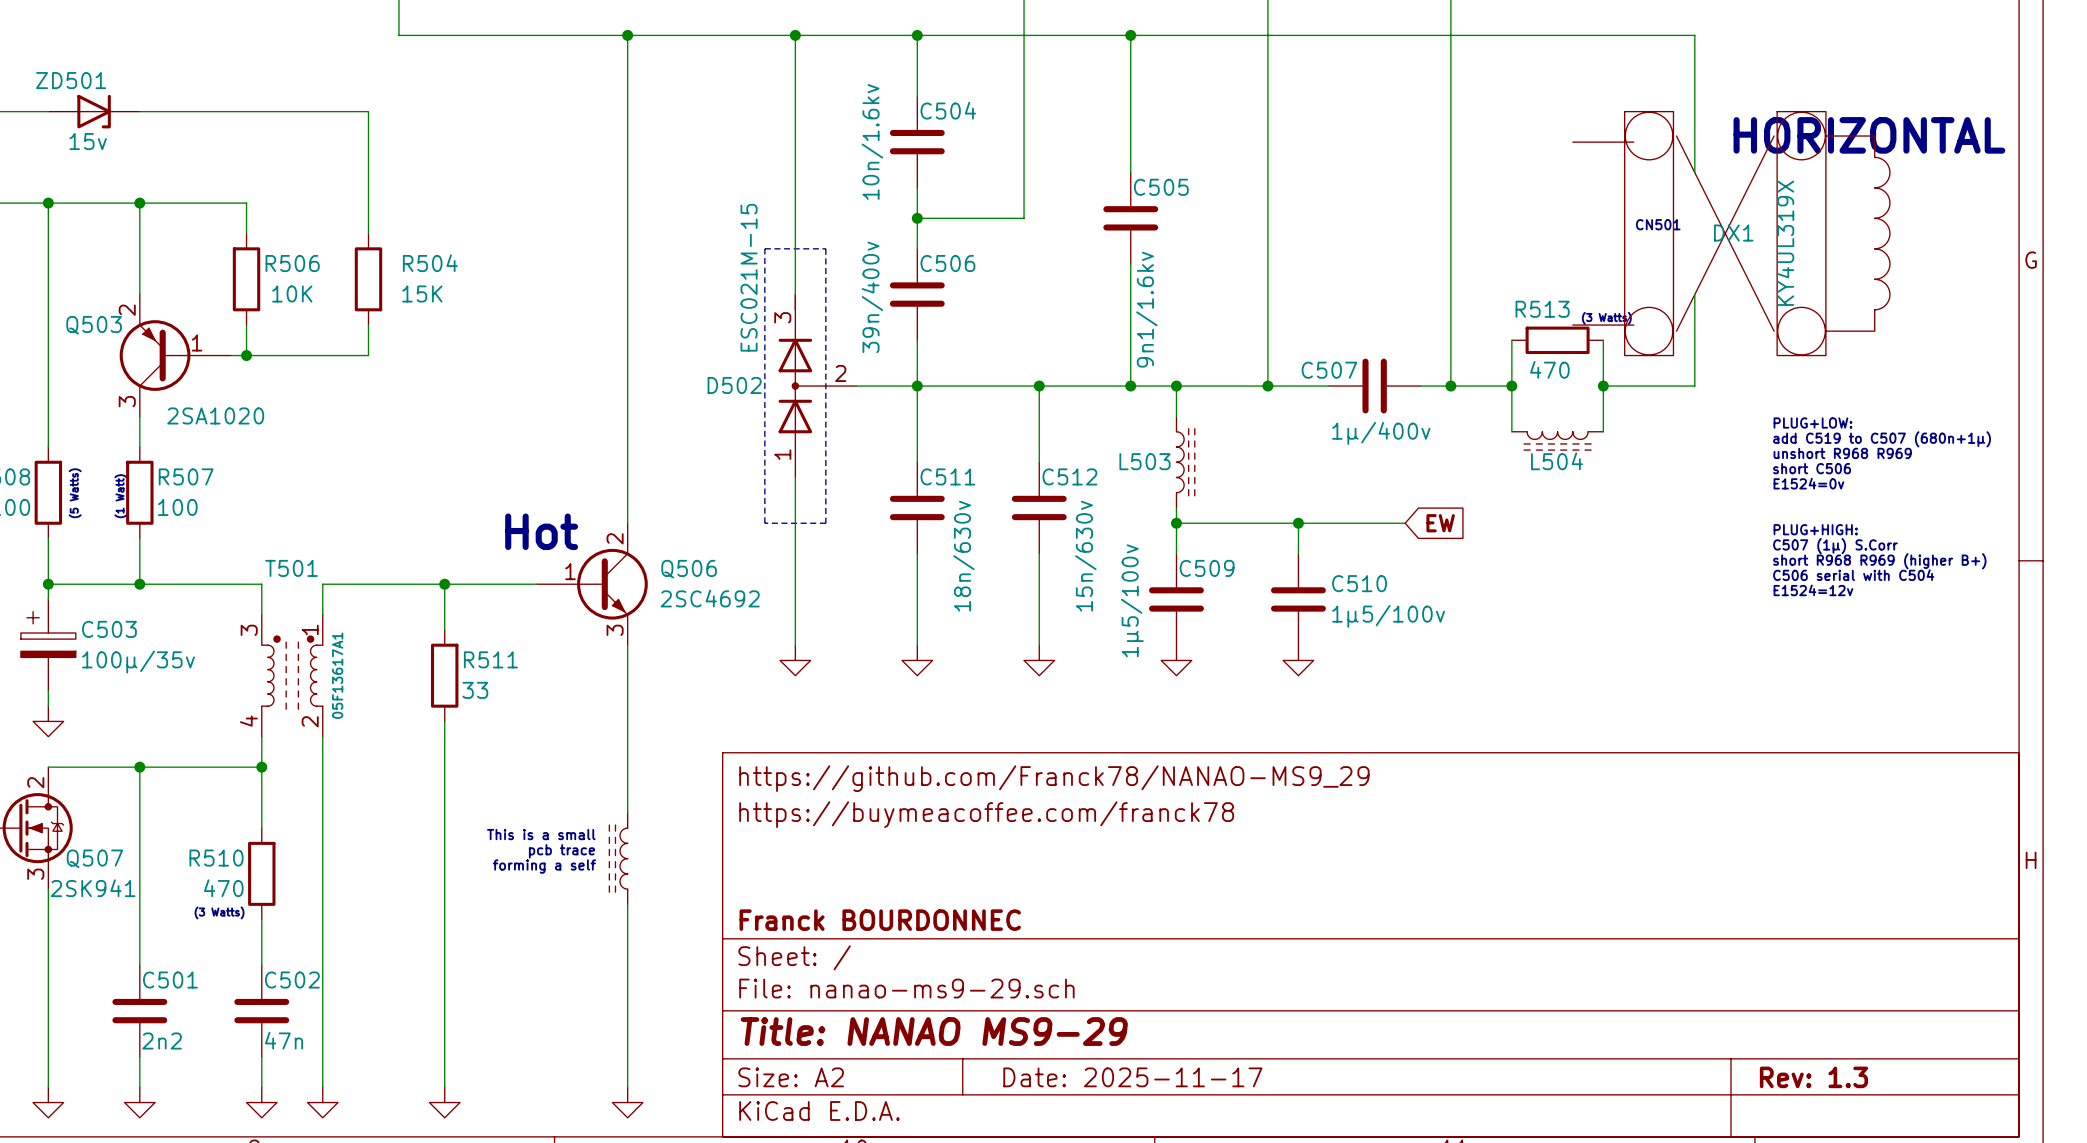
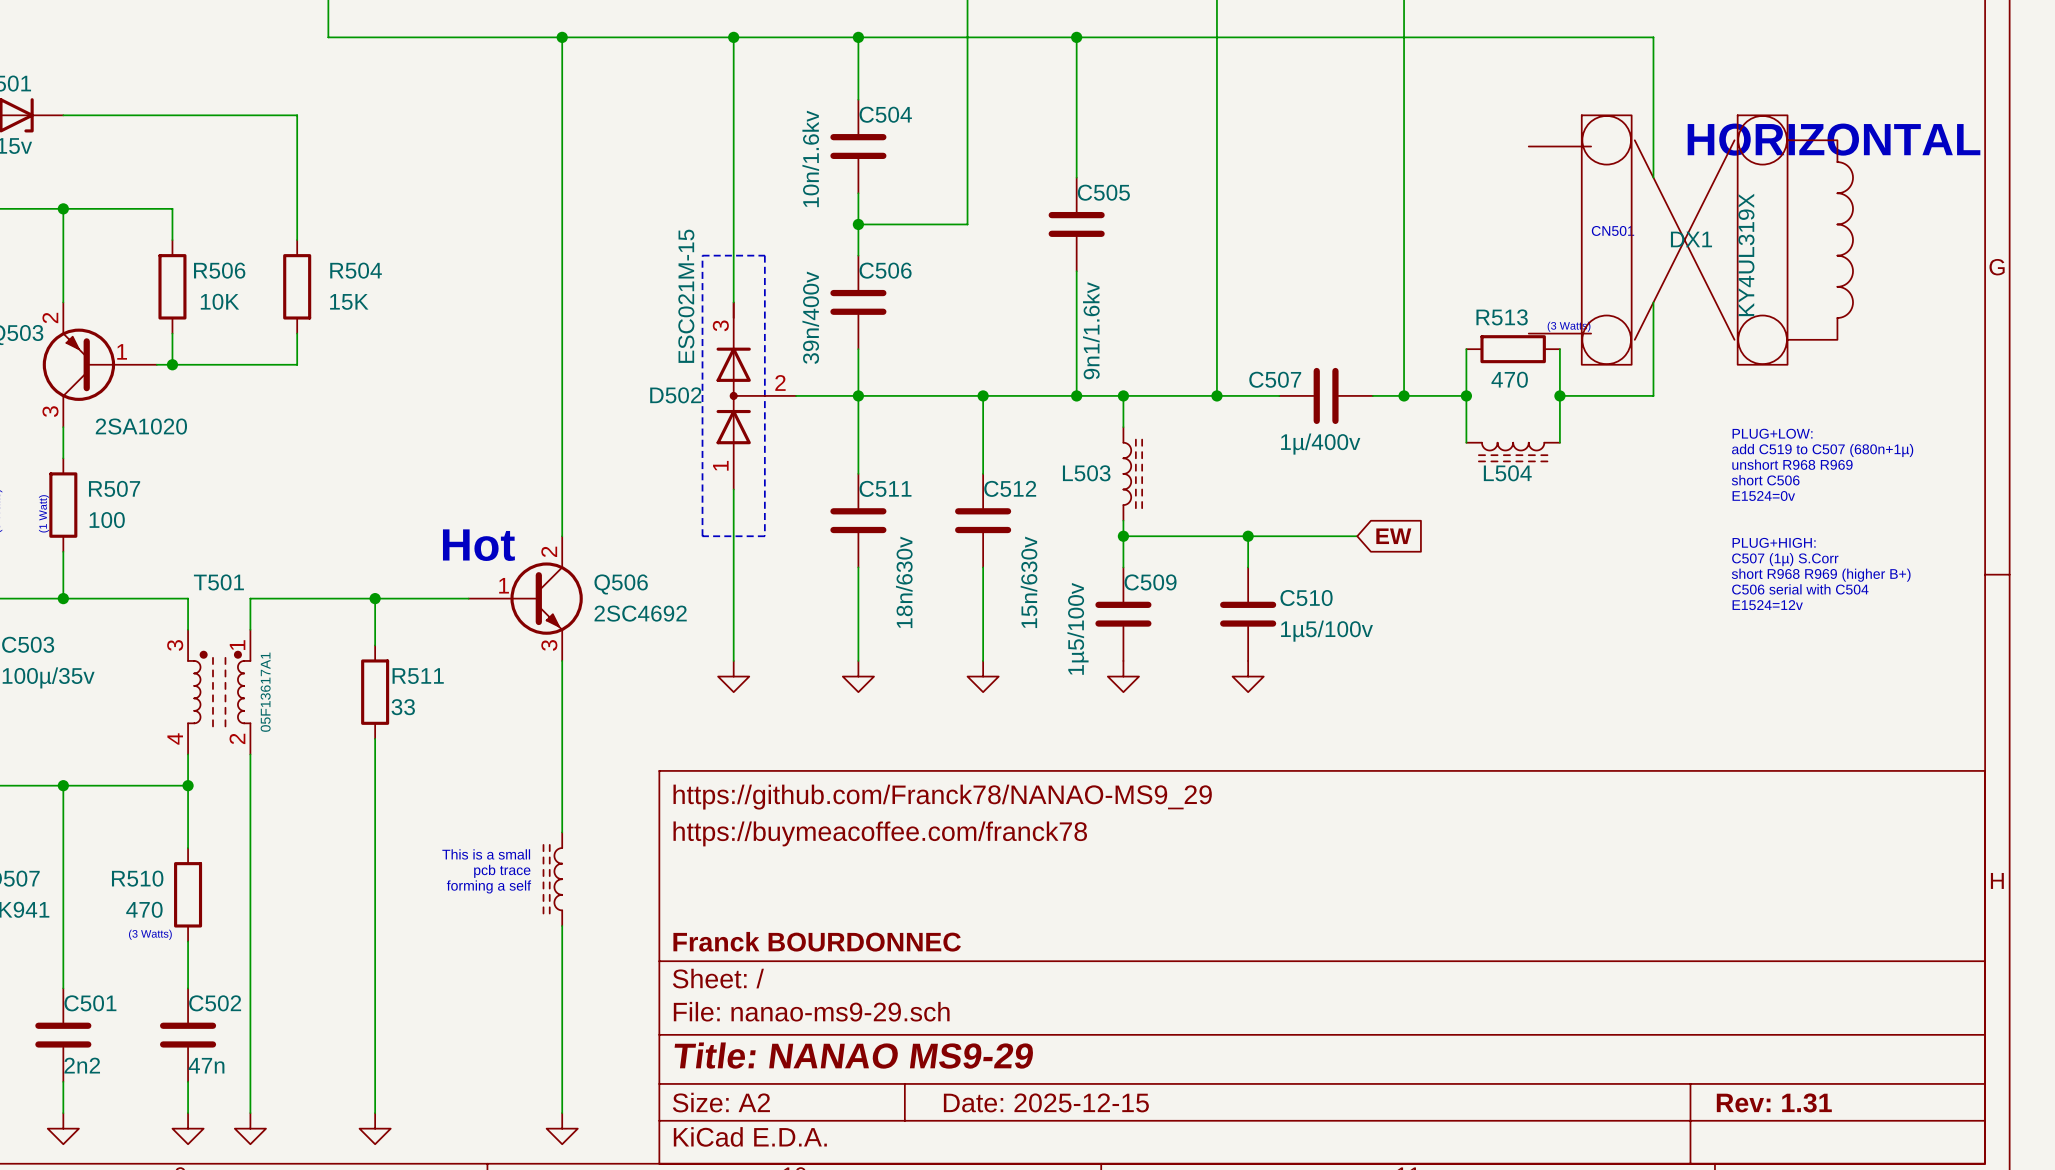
title block: Date: 2025-11-17 (1132, 1077) -> Date: 2025-12-15 (1046, 1102)
title block: Rev: 1.3 (1813, 1077) -> Rev: 1.31 (1774, 1102)

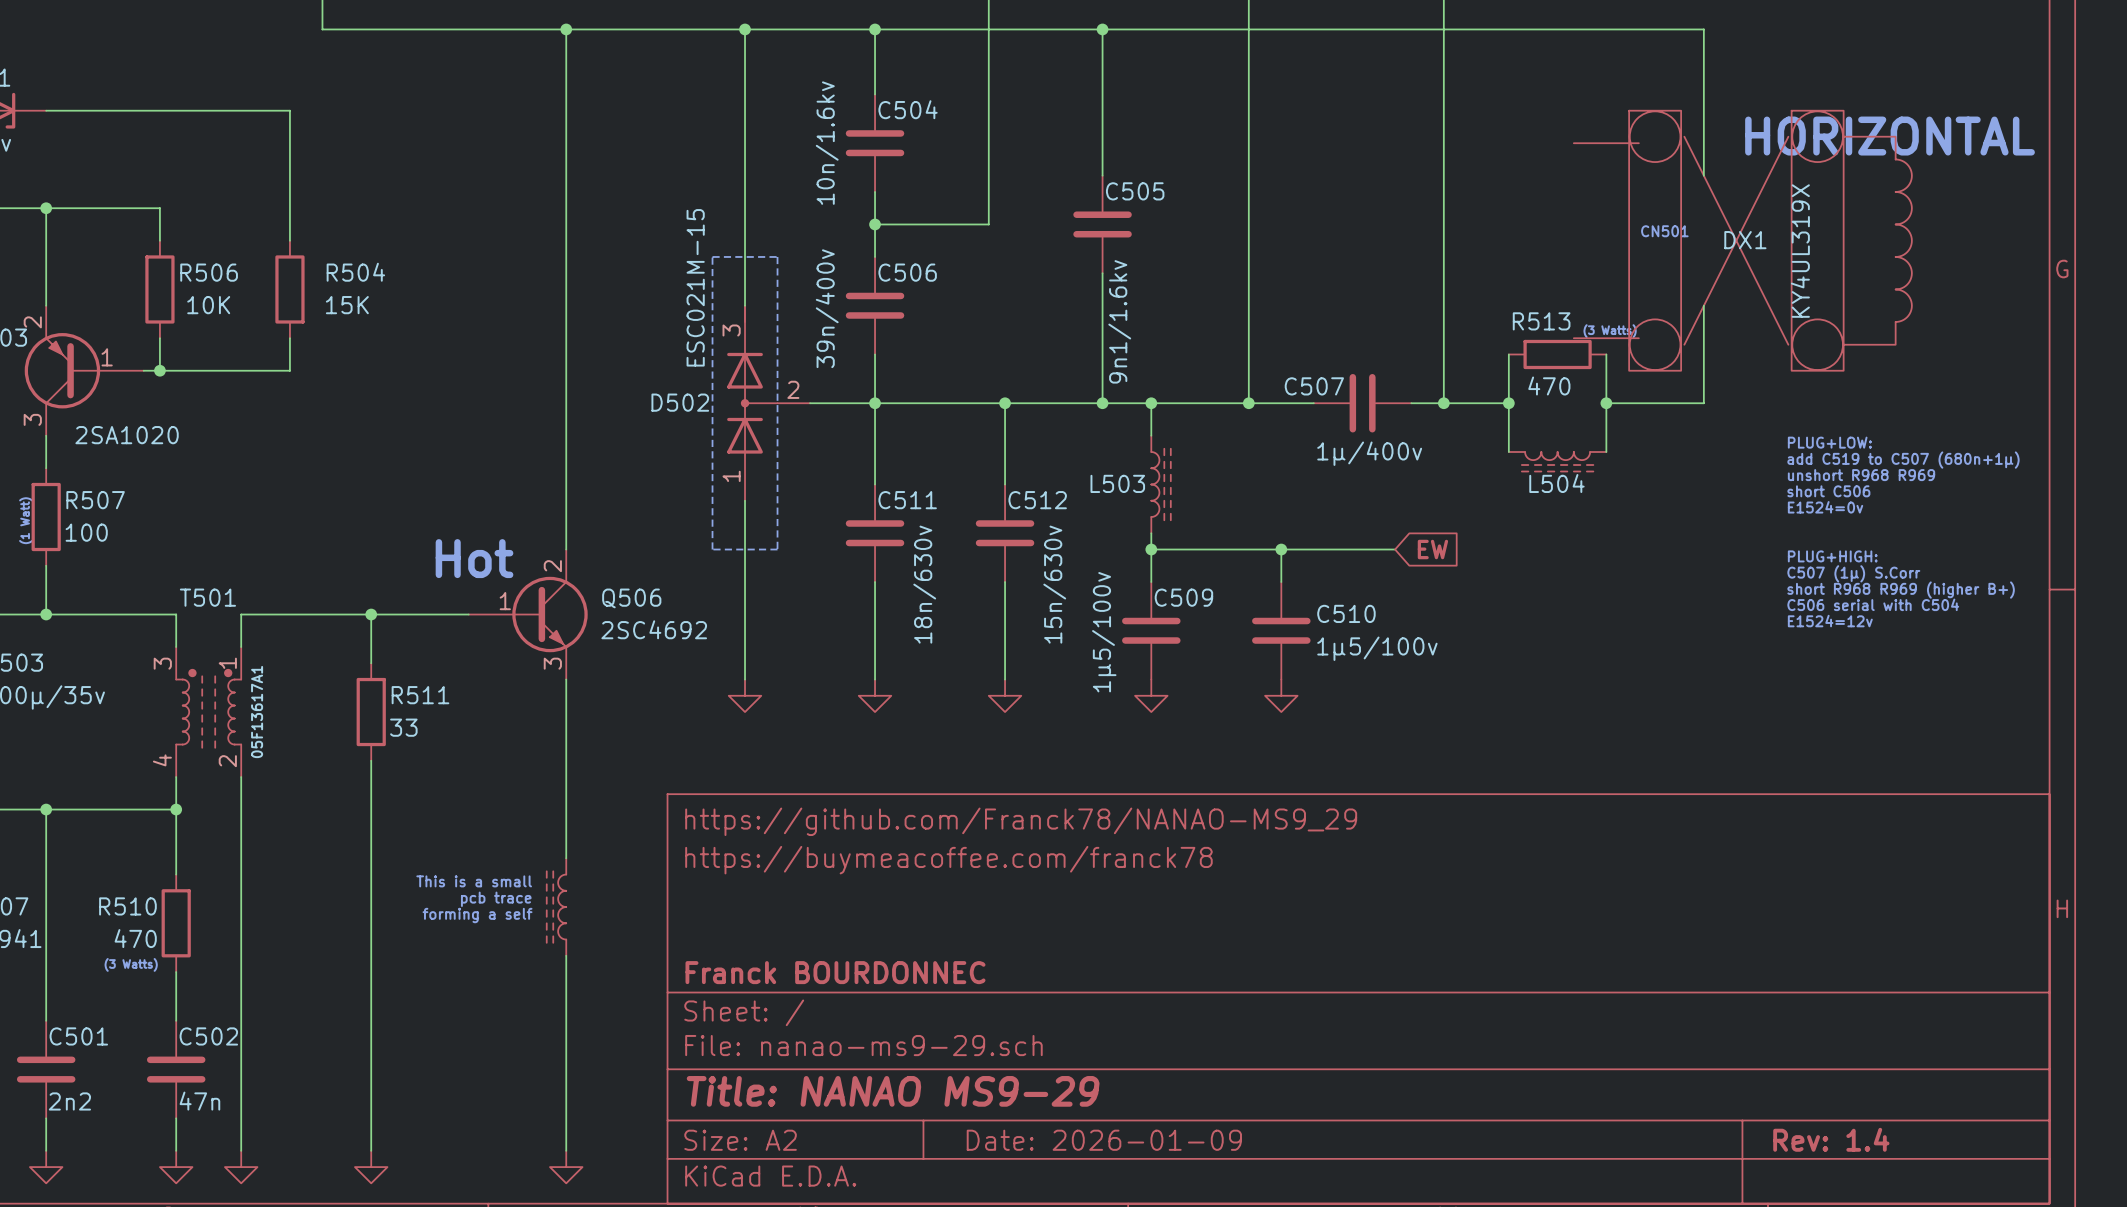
title block: Date: 2025-12-15 (1046, 1102) -> Date: 2026-01-09 (1104, 1140)
title block: Rev: 1.31 (1774, 1102) -> Rev: 1.4 (1831, 1139)

